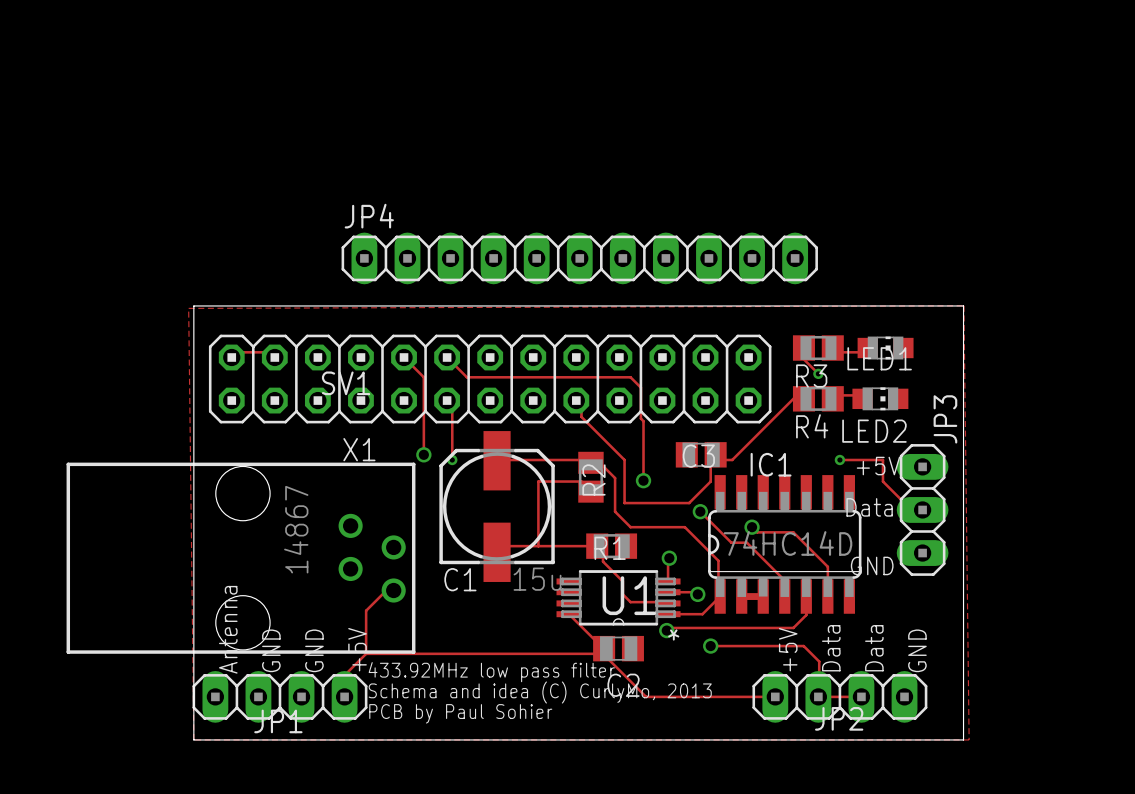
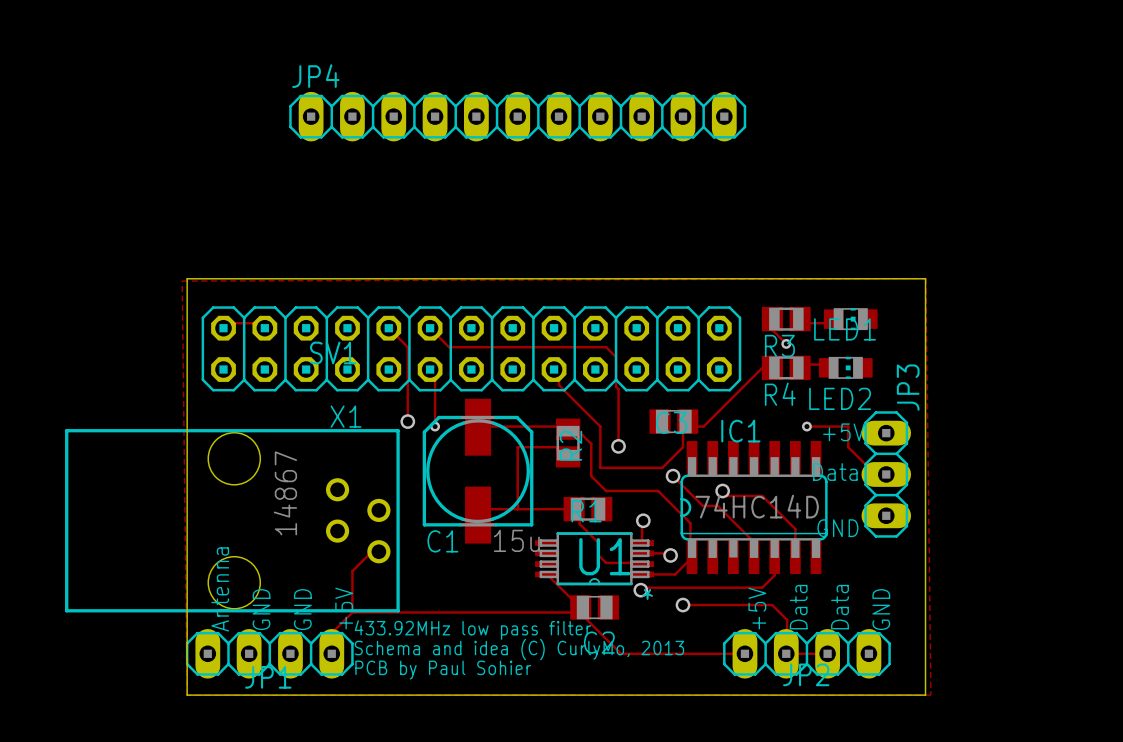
JP4 position: (579, 258) -> (517, 116)
track: (741, 596) (763, 596) -> none

